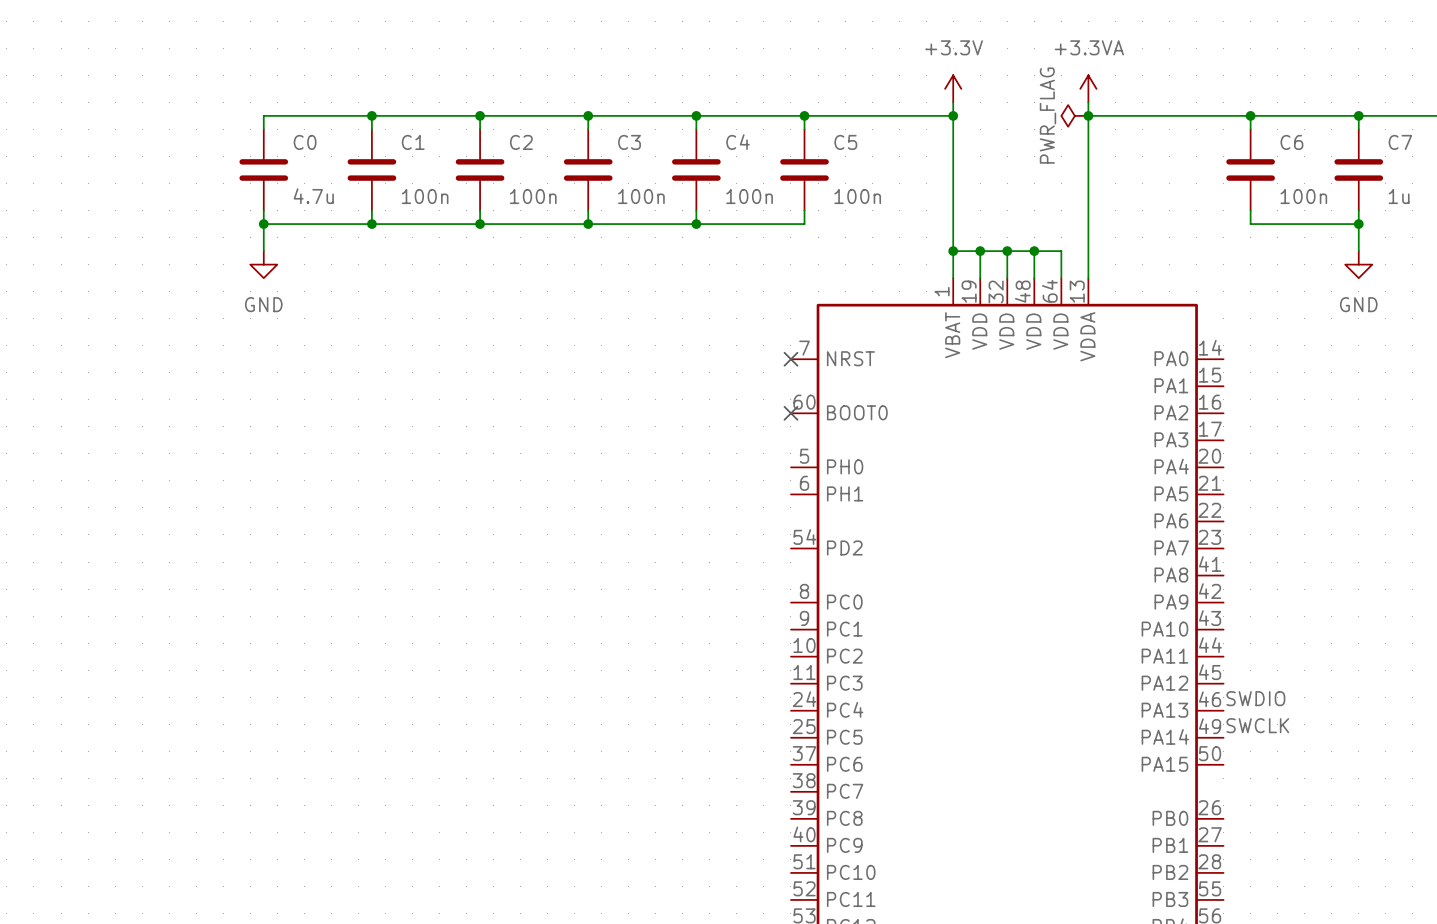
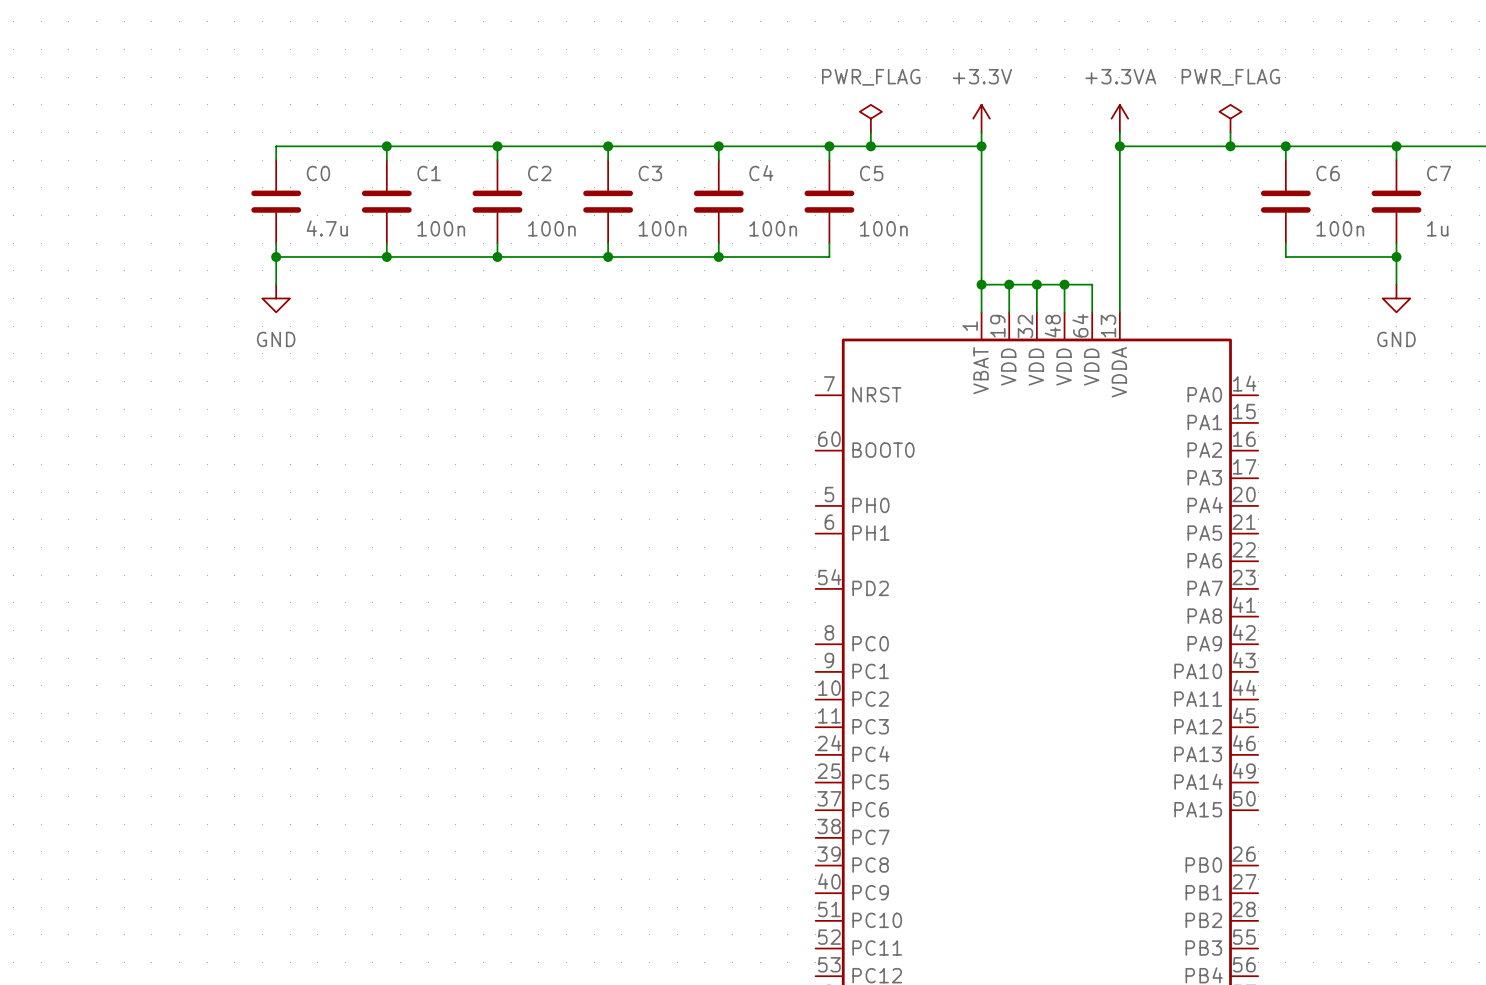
power symbol: none -> PWR_FLAG (870, 118)
power symbol: none -> PWR_FLAG (1230, 118)
wire: none -> (870, 132) (870, 146)
wire: none -> (1230, 132) (1230, 146)
junction: none -> (870, 146)
power symbol: PWR_FLAG (1074, 115) -> none
junction: none -> (1230, 146)
no-connect mark: (790, 359) -> none
no-connect mark: (790, 413) -> none
label: SWDIO (1255, 698) -> none
label: SWCLK (1257, 725) -> none

